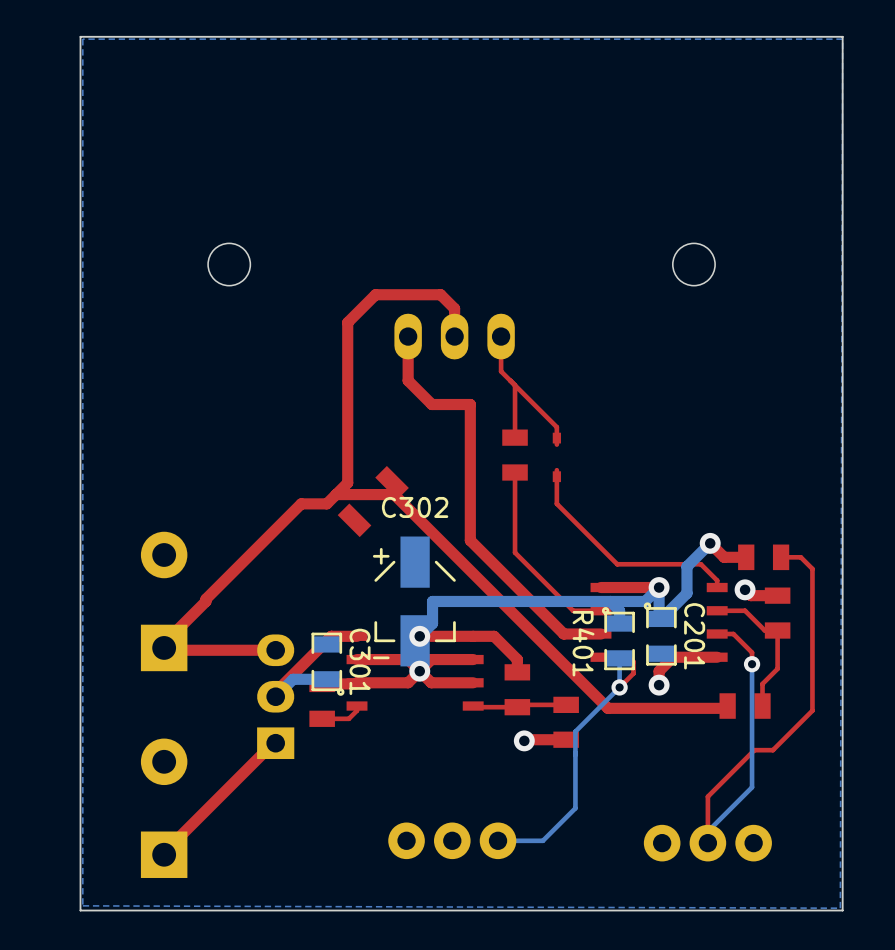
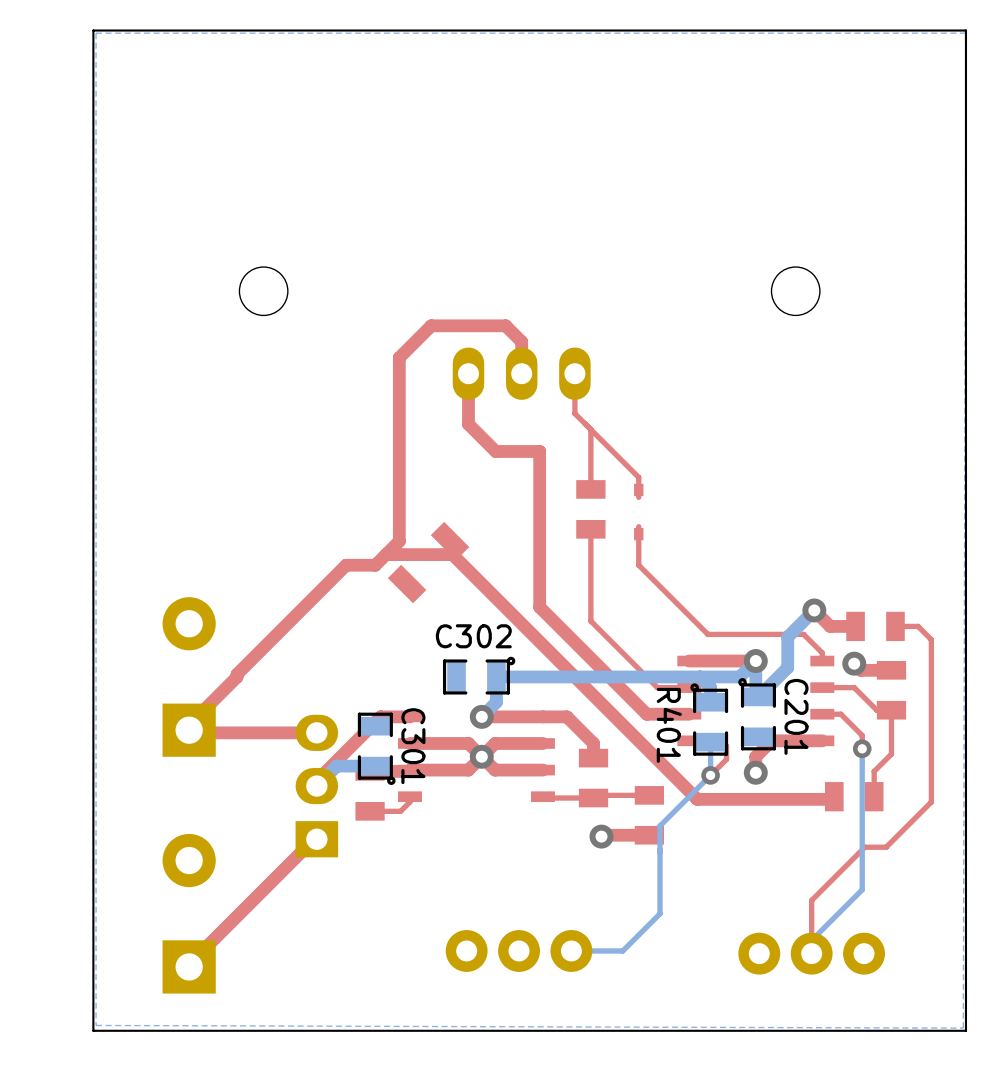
C302 name position: C302 (415, 507) -> C302 (473, 636)
C302 footprint: [374, 536, 456, 667] -> [442, 656, 516, 695]

